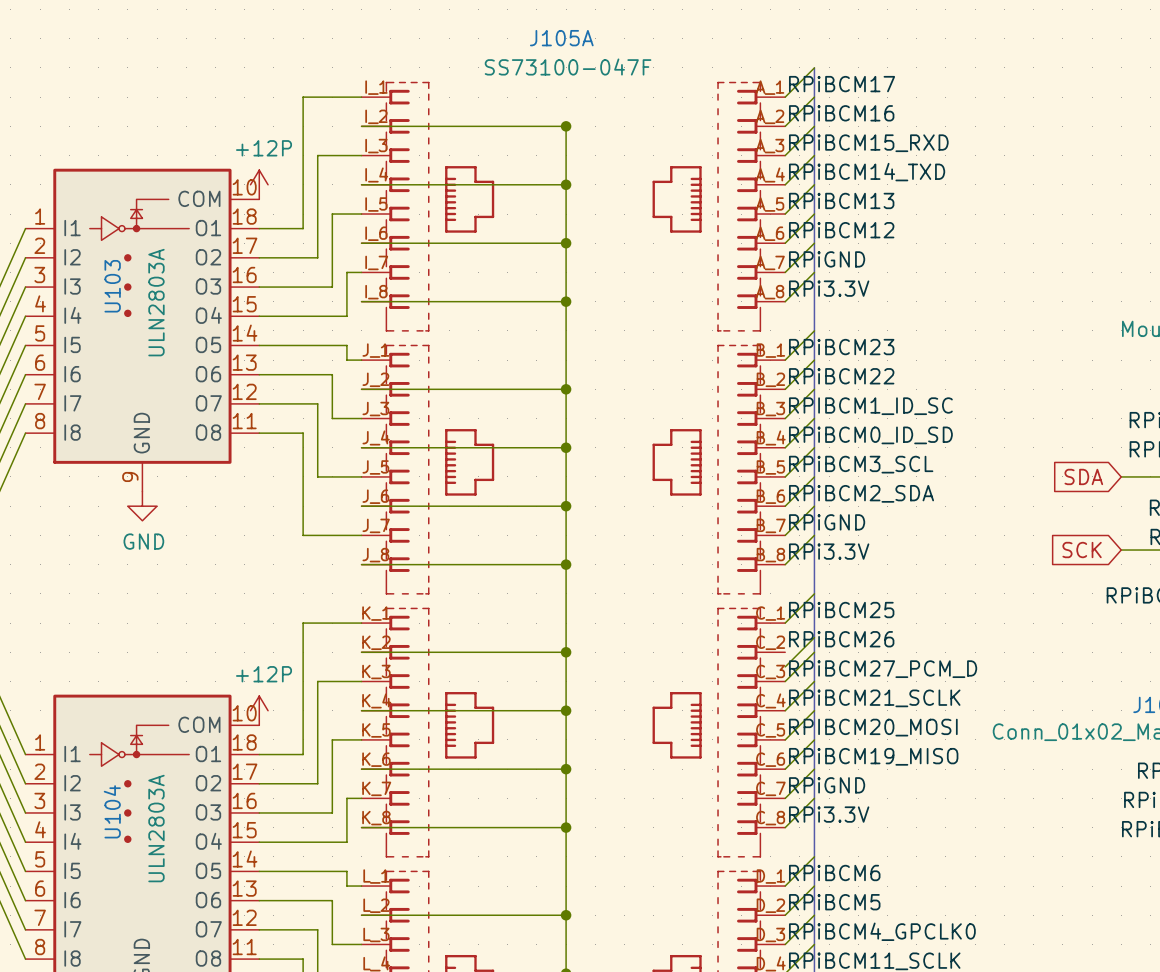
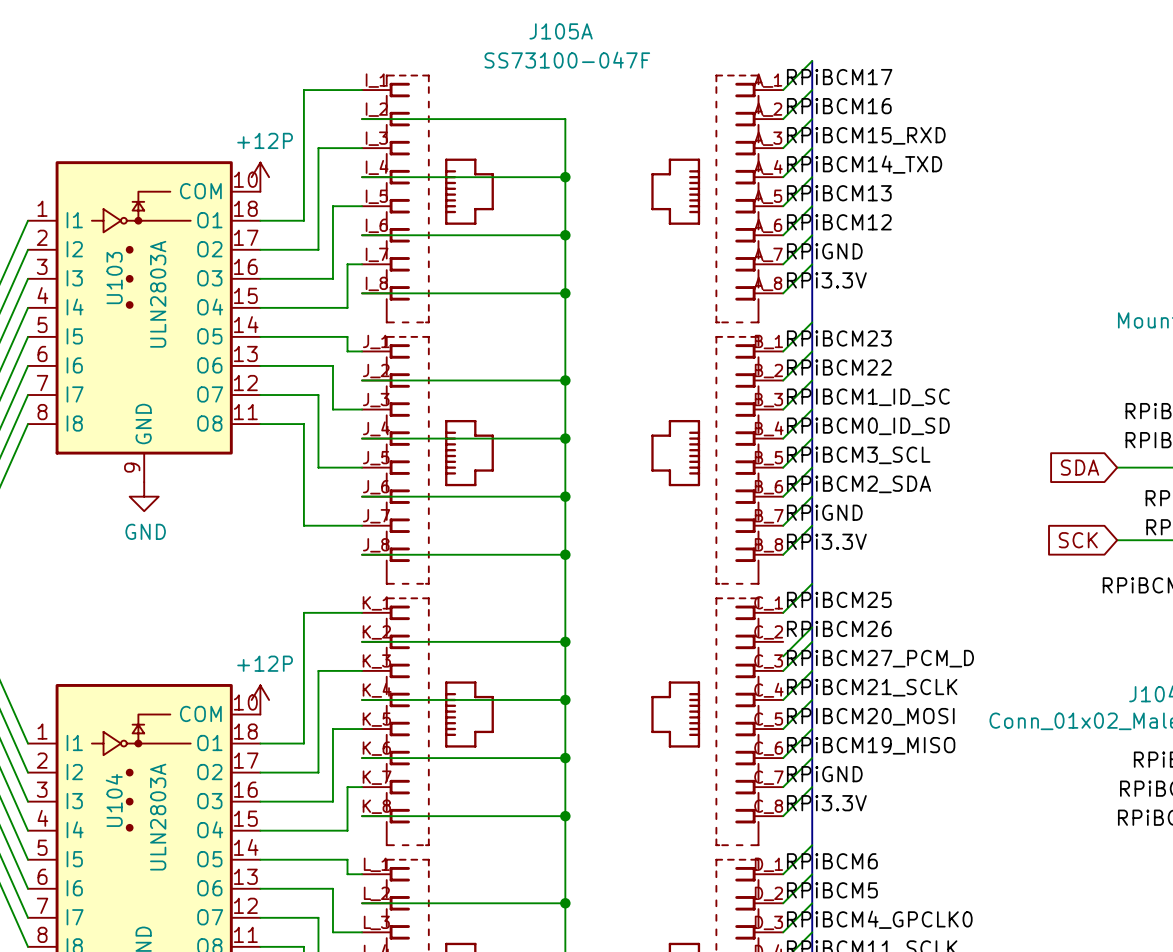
junction: (566, 126) -> none

